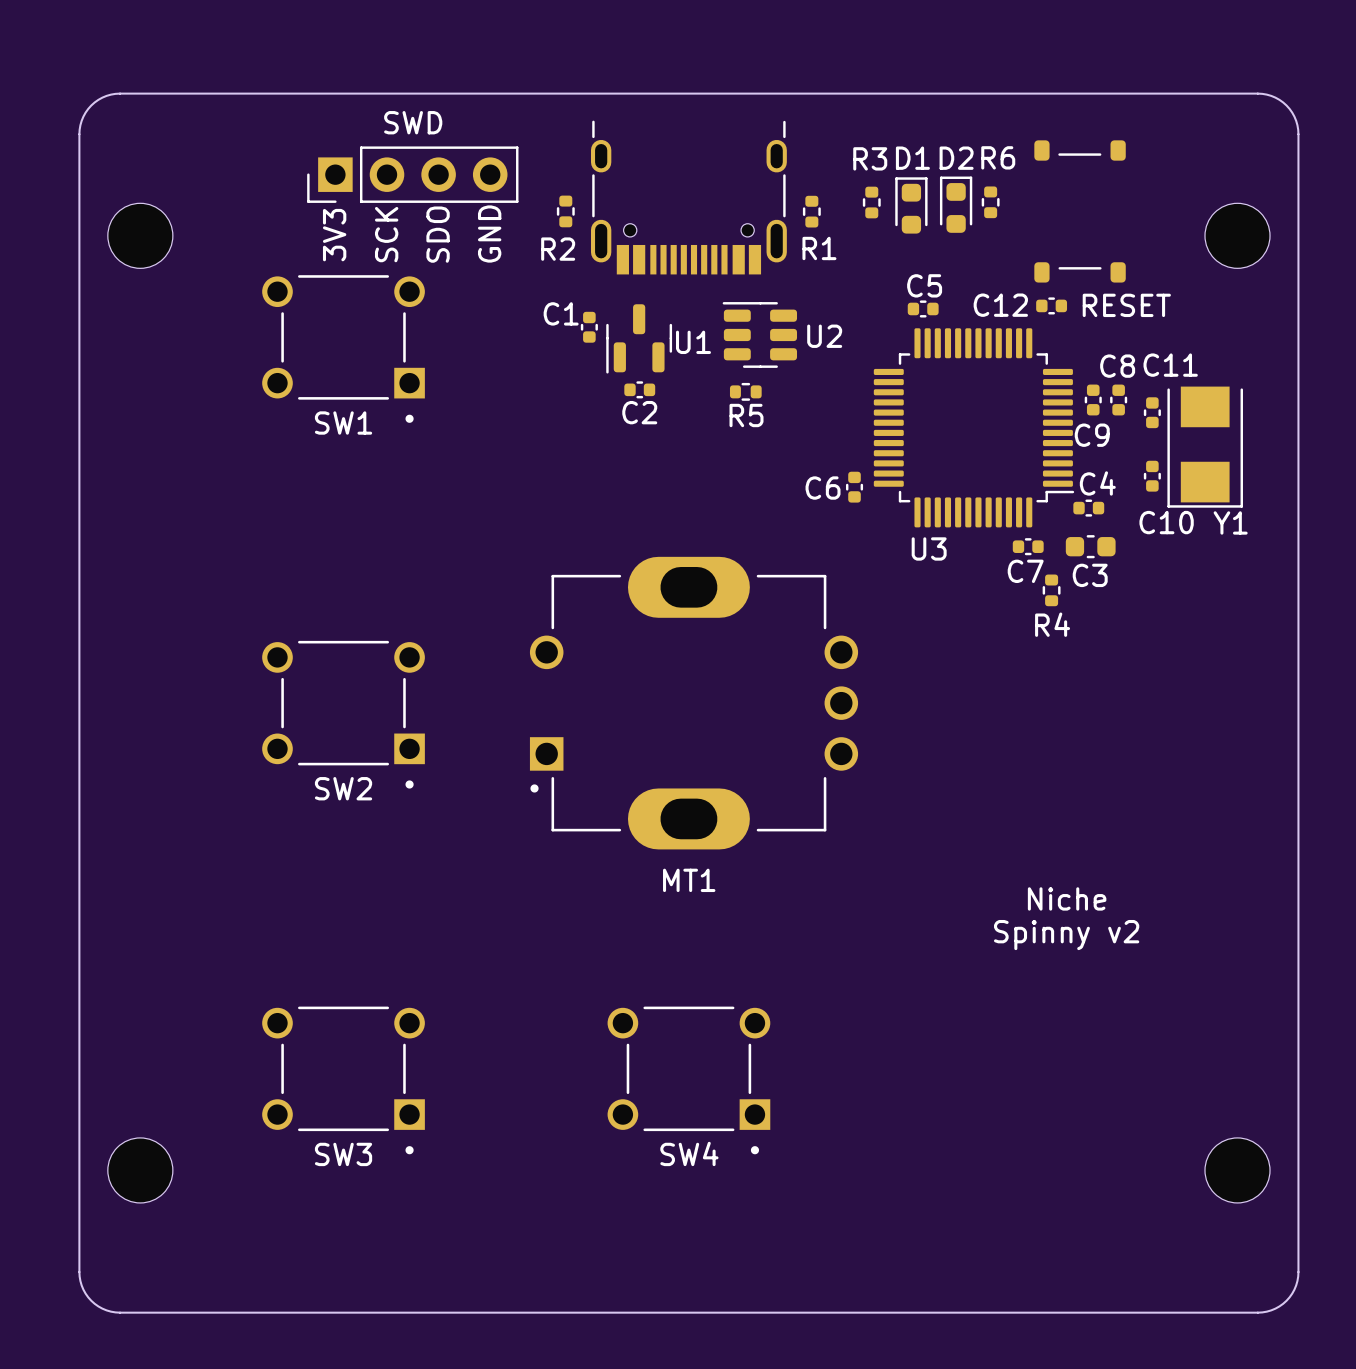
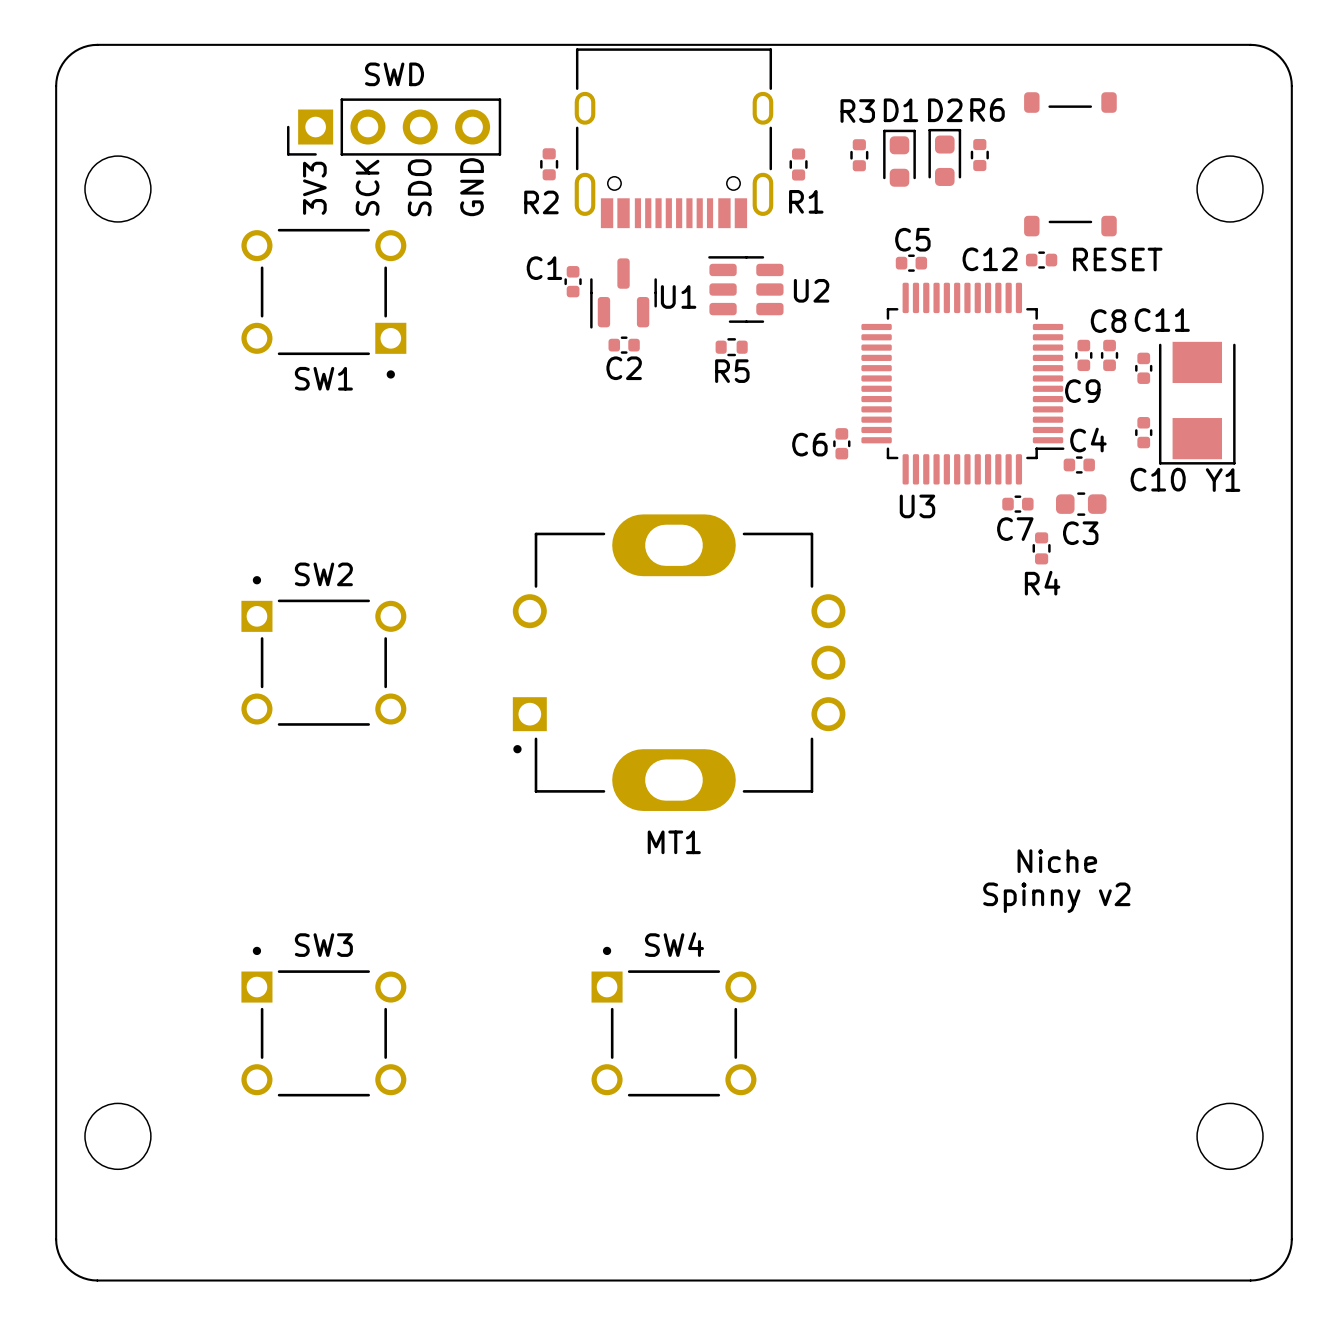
part footprint: [590, 120, 787, 275] -> [574, 48, 774, 229]
SW2 rotation: 0° (343, 714) -> 180° (323, 650)
SW3 rotation: 0° (343, 1080) -> 180° (323, 1021)
SW4 rotation: 0° (688, 1080) -> 180° (673, 1021)

